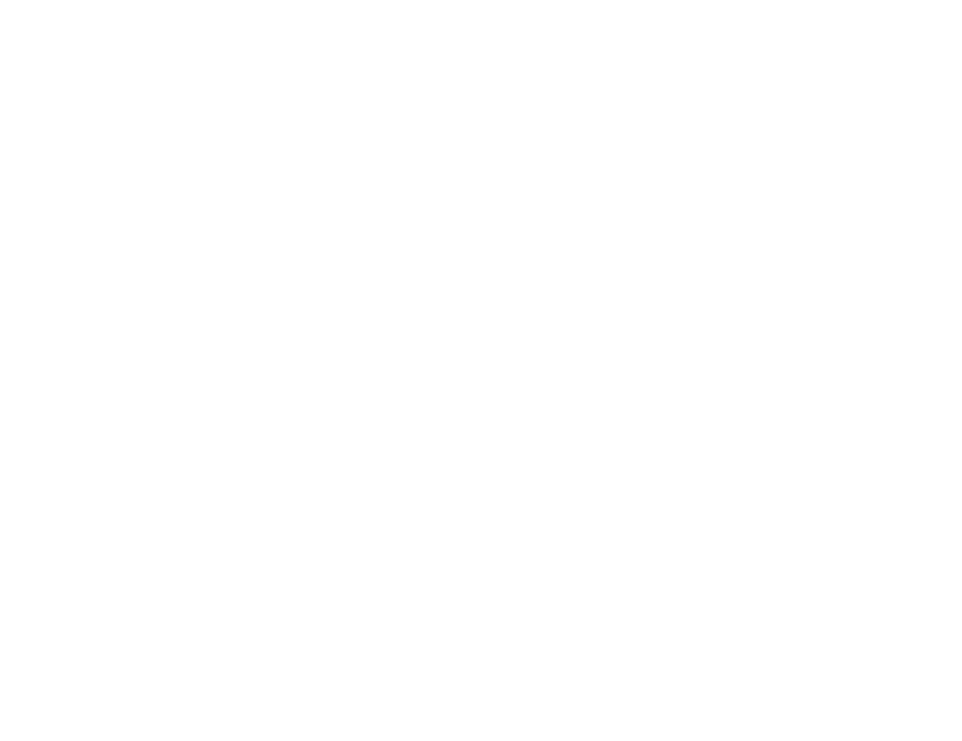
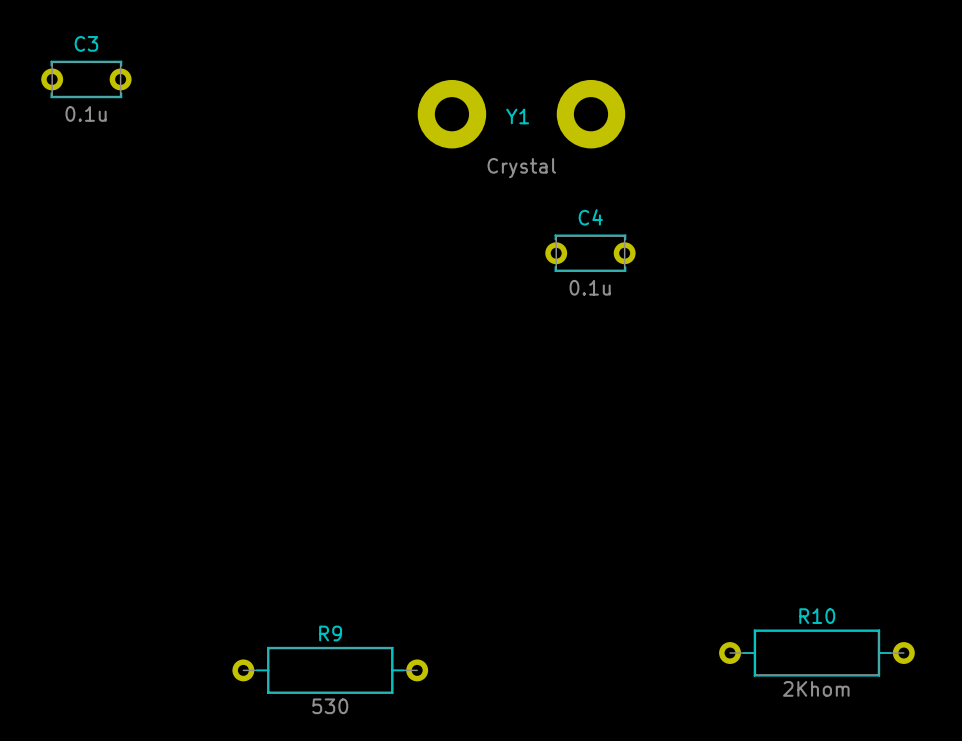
C3: none -> 0.1u (86, 79)
Y1: none -> Crystal (521, 114)
C4: none -> 0.1u (590, 253)
R10: none -> 2Khom (816, 653)
R9: none -> 530 (330, 670)

